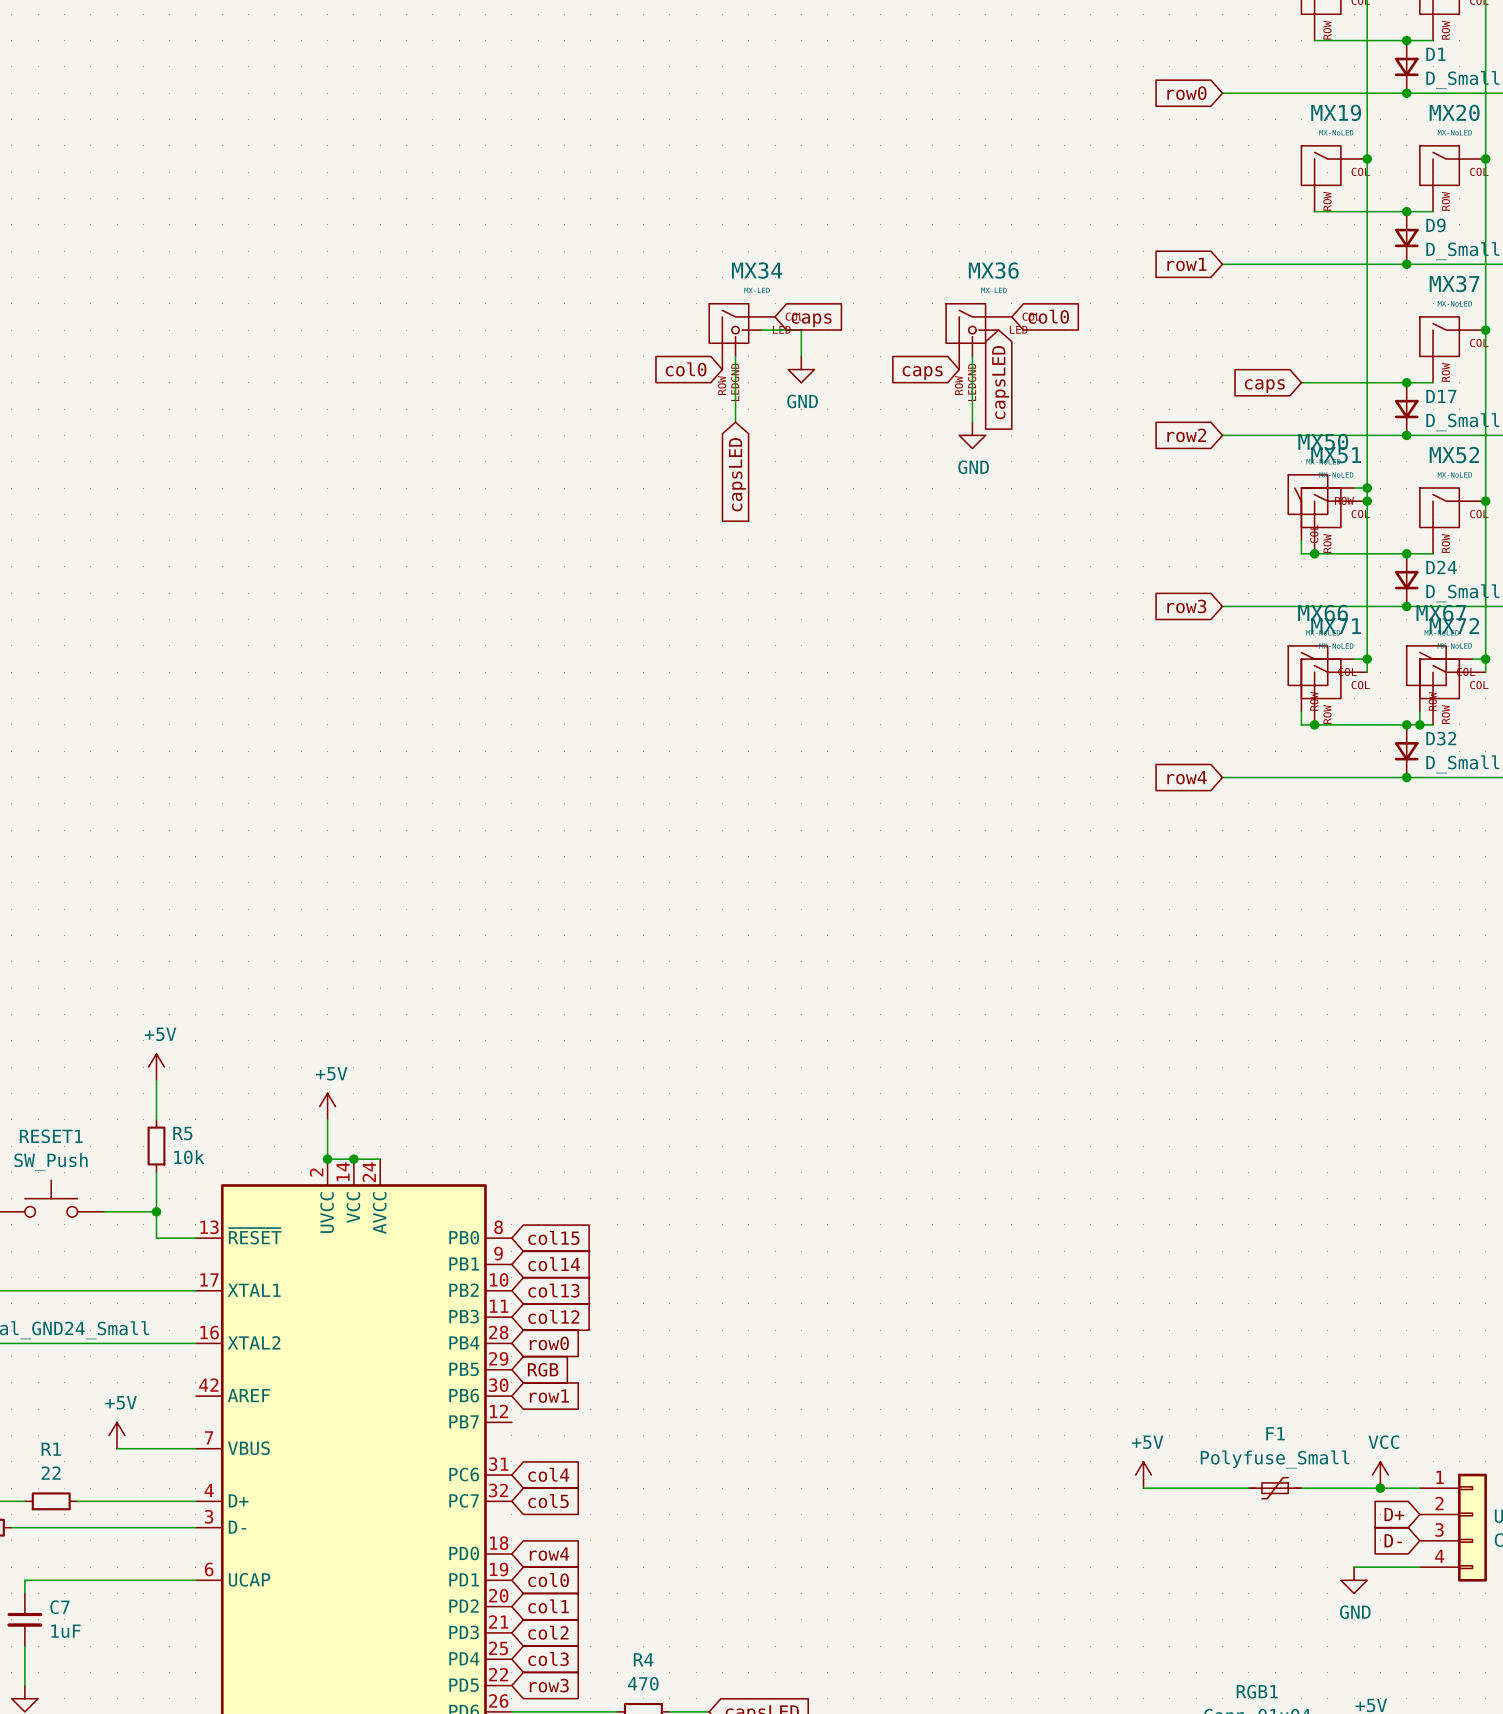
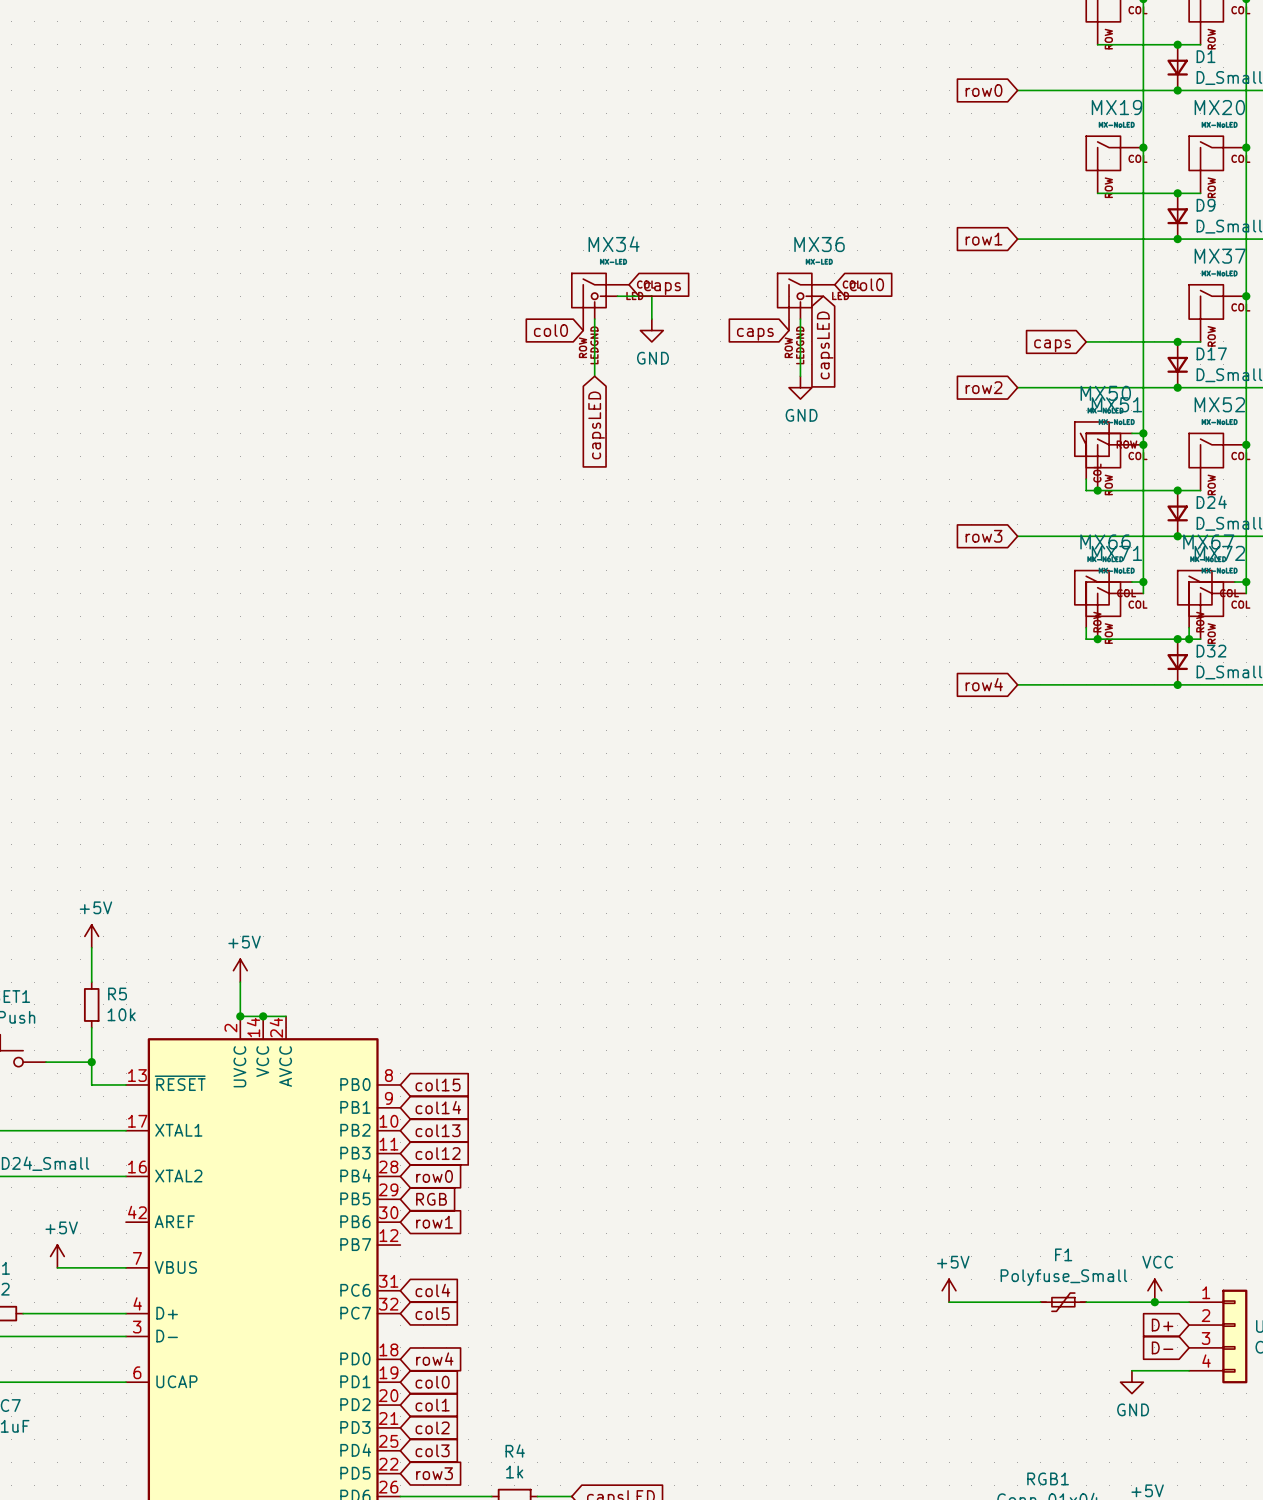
R4 value: 470 (643, 1683) -> 1k (514, 1472)

